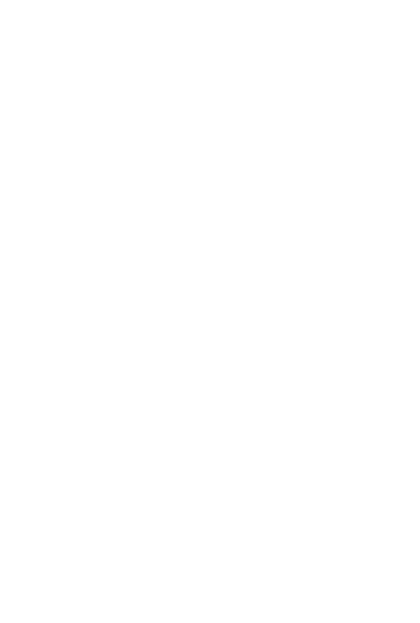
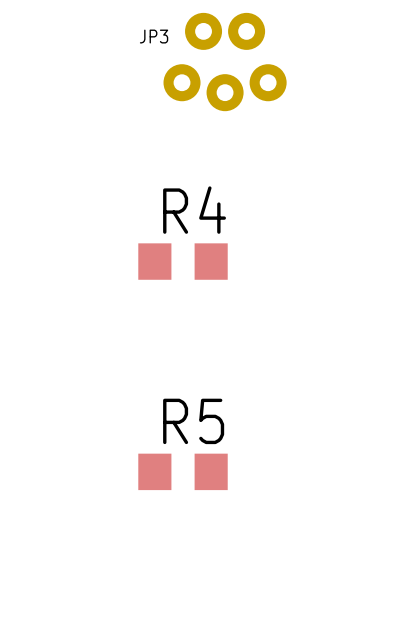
JP3: none -> (225, 62)
R4: none -> (183, 261)
R5: none -> (183, 471)

